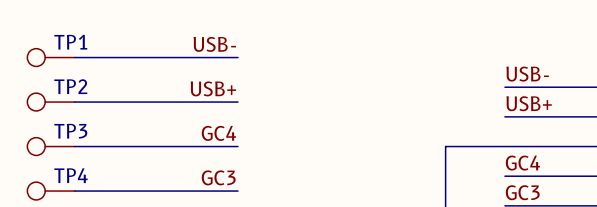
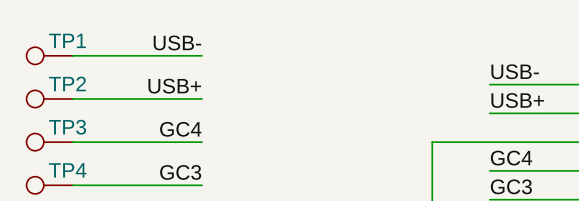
label position: USB- (214, 44) -> USB- (177, 42)
wire: (208, 57) (237, 57) -> none
label position: USB+ (213, 88) -> USB+ (174, 86)
wire: (208, 102) (237, 102) -> none
label position: GC4 (218, 133) -> GC4 (180, 129)
wire: (208, 146) (237, 146) -> none
label position: GC3 (218, 177) -> GC3 (180, 172)
wire: (208, 191) (237, 191) -> none

